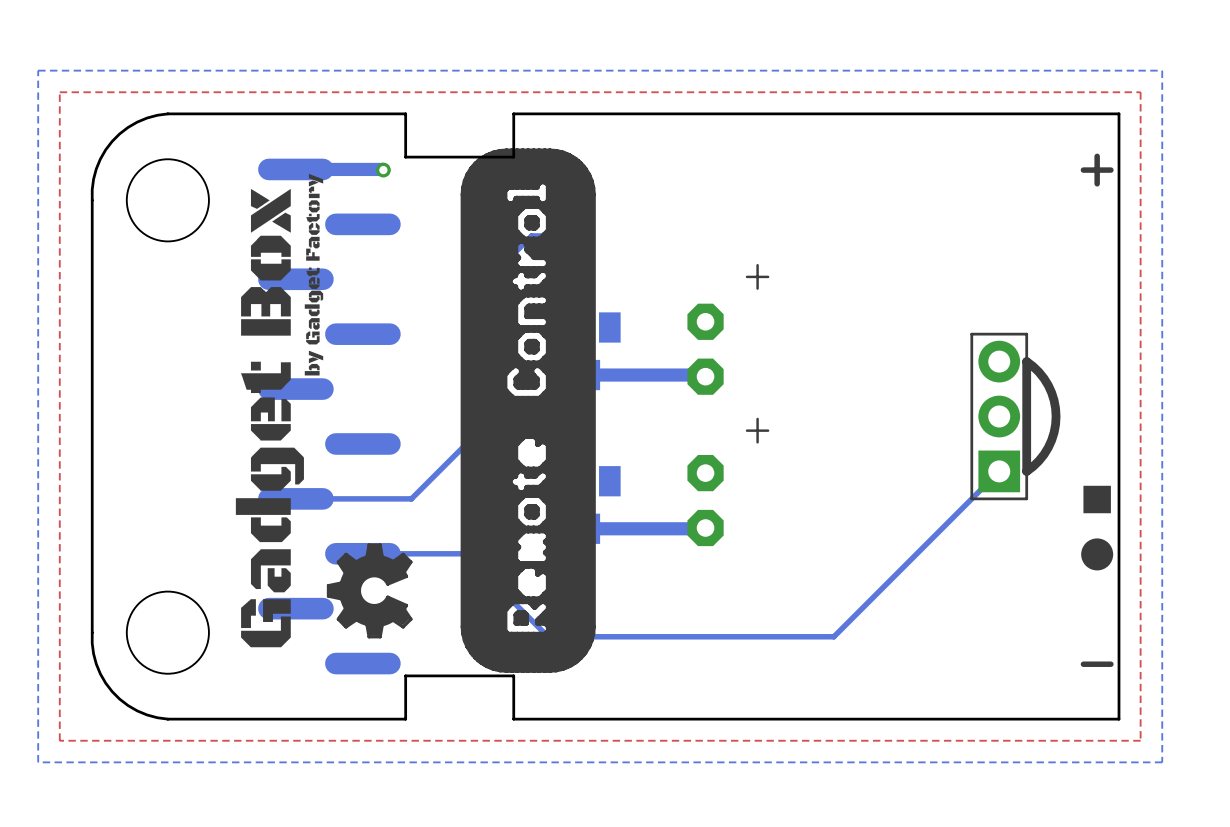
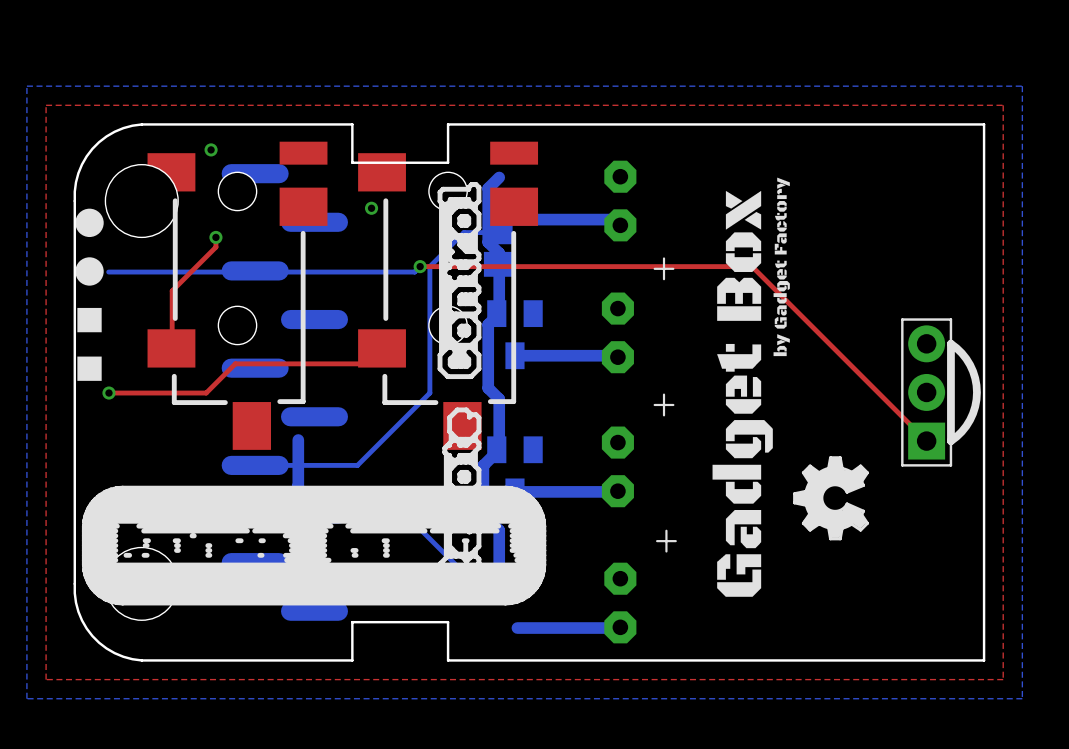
via: none -> (211, 149)
line: (500, 151) (500, 669) -> none
line: (506, 151) (506, 188) -> none
line: (506, 151) (493, 153) (481, 159) (468, 174) (463, 187) (463, 633) (471, 652) (481, 661) (493, 667) (506, 670) (556, 669) (569, 665) (584, 652) (590, 640) (593, 626) (592, 187) (584, 169) (569, 155) (549, 151) (506, 151) -> none
line: (511, 151) (511, 187) -> none
line: (517, 151) (517, 187) -> none
line: (522, 151) (522, 187) -> none
line: (528, 151) (528, 187) -> none
line: (533, 151) (533, 187) -> none
line: (539, 151) (539, 182) -> none
line: (544, 151) (544, 181) -> none
line: (550, 151) (550, 670) -> none
line: (555, 151) (555, 669) -> none
line: (495, 152) (495, 668) -> none
line: (561, 152) (561, 668) -> none
line: (489, 154) (489, 666) -> none
line: (566, 154) (566, 666) -> none
line: (1097, 156) (1097, 183) -> none
line: (484, 157) (484, 663) -> none
line: (572, 157) (572, 663) -> none
line: (478, 161) (478, 659) -> none
line: (577, 161) (577, 659) -> none
line: (473, 167) (473, 654) -> none
line: (583, 167) (583, 654) -> none
bottom track: (295, 169) (383, 170) -> none
via position: (383, 170) -> (371, 208)
line: (1083, 170) (1110, 170) -> none
drawing: [235, 173, 413, 648] -> none
drawing: none -> [712, 177, 869, 597]
line: (467, 175) (467, 645) -> none
line: (588, 175) (588, 645) -> none
part: none -> (620, 201)
drawing: none -> [75, 208, 104, 333]
bottom track: none -> (517, 219) (614, 219) (620, 225)
top track: none -> (215, 237) (215, 247) (172, 290) (171, 348)
via: none -> (215, 237)
bottom track: none -> (420, 266) (414, 272) (108, 272)
top track: none -> (420, 266) (752, 266) (926, 441)
via: none -> (420, 266)
part: none -> (237, 295)
part: none -> (448, 295)
top track: none -> (382, 348) (366, 363) (235, 363) (206, 393) (108, 393)
drawing: none -> [77, 356, 102, 381]
line: (506, 391) (506, 608) -> none
line: (544, 393) (544, 441) -> none
line: (511, 396) (511, 477) -> none
line: (517, 398) (517, 443) -> none
line: (522, 398) (522, 437) -> none
line: (528, 398) (528, 436) -> none
line: (533, 398) (533, 436) -> none
line: (539, 398) (539, 442) -> none
part position: (1015, 416) -> (940, 392)
via: none -> (108, 393)
bottom track: none -> (298, 440) (297, 486)
bottom track: (999, 471) (833, 636) (569, 636) -> (499, 177) (488, 188) (488, 242) (499, 253) (499, 313) (488, 324) (488, 388) (499, 399) (499, 449) (483, 465) (483, 514) (499, 530) (499, 585) (497, 587)
drawing: [1081, 485, 1114, 571] -> none
line: none -> (105, 492) (522, 492)
line: none -> (98, 496) (529, 496)
line: none -> (93, 501) (534, 501)
line: none -> (89, 506) (538, 506)
line: none -> (87, 511) (540, 511)
line: none -> (85, 516) (542, 516)
line: none -> (84, 521) (543, 521)
line: none -> (84, 526) (117, 526)
line: none -> (138, 526) (331, 526)
line: none -> (347, 526) (498, 526)
line: none -> (510, 526) (543, 526)
line: none -> (84, 531) (115, 531)
line: none -> (143, 531) (247, 531)
line: none -> (254, 531) (326, 531)
line: none -> (352, 531) (425, 531)
line: none -> (432, 531) (497, 531)
line: none -> (512, 531) (543, 531)
line: none -> (84, 535) (115, 535)
line: none -> (192, 535) (194, 535)
line: none -> (285, 535) (324, 535)
line: none -> (512, 535) (543, 535)
line: none -> (84, 540) (115, 540)
line: none -> (145, 540) (148, 540)
line: none -> (175, 540) (178, 540)
line: none -> (237, 540) (241, 540)
line: none -> (260, 540) (263, 540)
line: none -> (290, 540) (324, 540)
line: none -> (384, 540) (387, 540)
line: none -> (464, 540) (467, 540)
line: none -> (512, 540) (543, 540)
text: none -> + (666, 541)
line: none -> (84, 545) (115, 545)
line: none -> (145, 545) (147, 545)
line: none -> (176, 545) (178, 545)
line: none -> (207, 545) (209, 545)
line: none -> (291, 545) (324, 545)
line: none -> (385, 545) (387, 545)
line: none -> (512, 545) (543, 545)
line: none -> (84, 550) (115, 550)
line: none -> (176, 550) (178, 550)
line: none -> (207, 550) (209, 550)
line: none -> (291, 550) (324, 550)
line: none -> (352, 550) (356, 550)
line: none -> (385, 550) (387, 550)
line: none -> (512, 550) (543, 550)
line: none -> (84, 555) (115, 555)
line: none -> (126, 555) (129, 555)
line: none -> (144, 555) (147, 555)
line: none -> (207, 555) (209, 555)
line: none -> (259, 555) (262, 555)
line: none -> (285, 555) (324, 555)
line: none -> (354, 555) (356, 555)
line: none -> (385, 555) (387, 555)
line: none -> (515, 555) (543, 555)
line: none -> (84, 560) (115, 560)
line: none -> (286, 560) (329, 560)
line: none -> (516, 560) (543, 560)
line: none -> (84, 565) (543, 565)
line: none -> (84, 569) (543, 569)
line: none -> (85, 574) (542, 574)
line: none -> (87, 579) (540, 579)
line: (506, 632) (506, 670) -> none
line: none -> (89, 584) (538, 584)
line: (511, 634) (511, 670) -> none
line: (517, 634) (517, 670) -> none
line: (522, 634) (522, 670) -> none
line: (528, 634) (528, 670) -> none
line: (533, 634) (533, 670) -> none
line: (539, 634) (539, 670) -> none
line: (544, 634) (544, 670) -> none
line: none -> (93, 589) (534, 589)
line: none -> (534, 589) (543, 570) (543, 520) (539, 509) (532, 499) (522, 492) (511, 488) (122, 488) (110, 490) (100, 495) (88, 509) (84, 520) (84, 564) (86, 576) (91, 587) (100, 595) (116, 602) (505, 603) (522, 598) (534, 589)
line: none -> (98, 594) (529, 594)
line: none -> (105, 599) (522, 599)
part: none -> (620, 603)
line: (1083, 664) (1110, 664) -> none
bottom track: none -> (620, 627) (517, 628)

